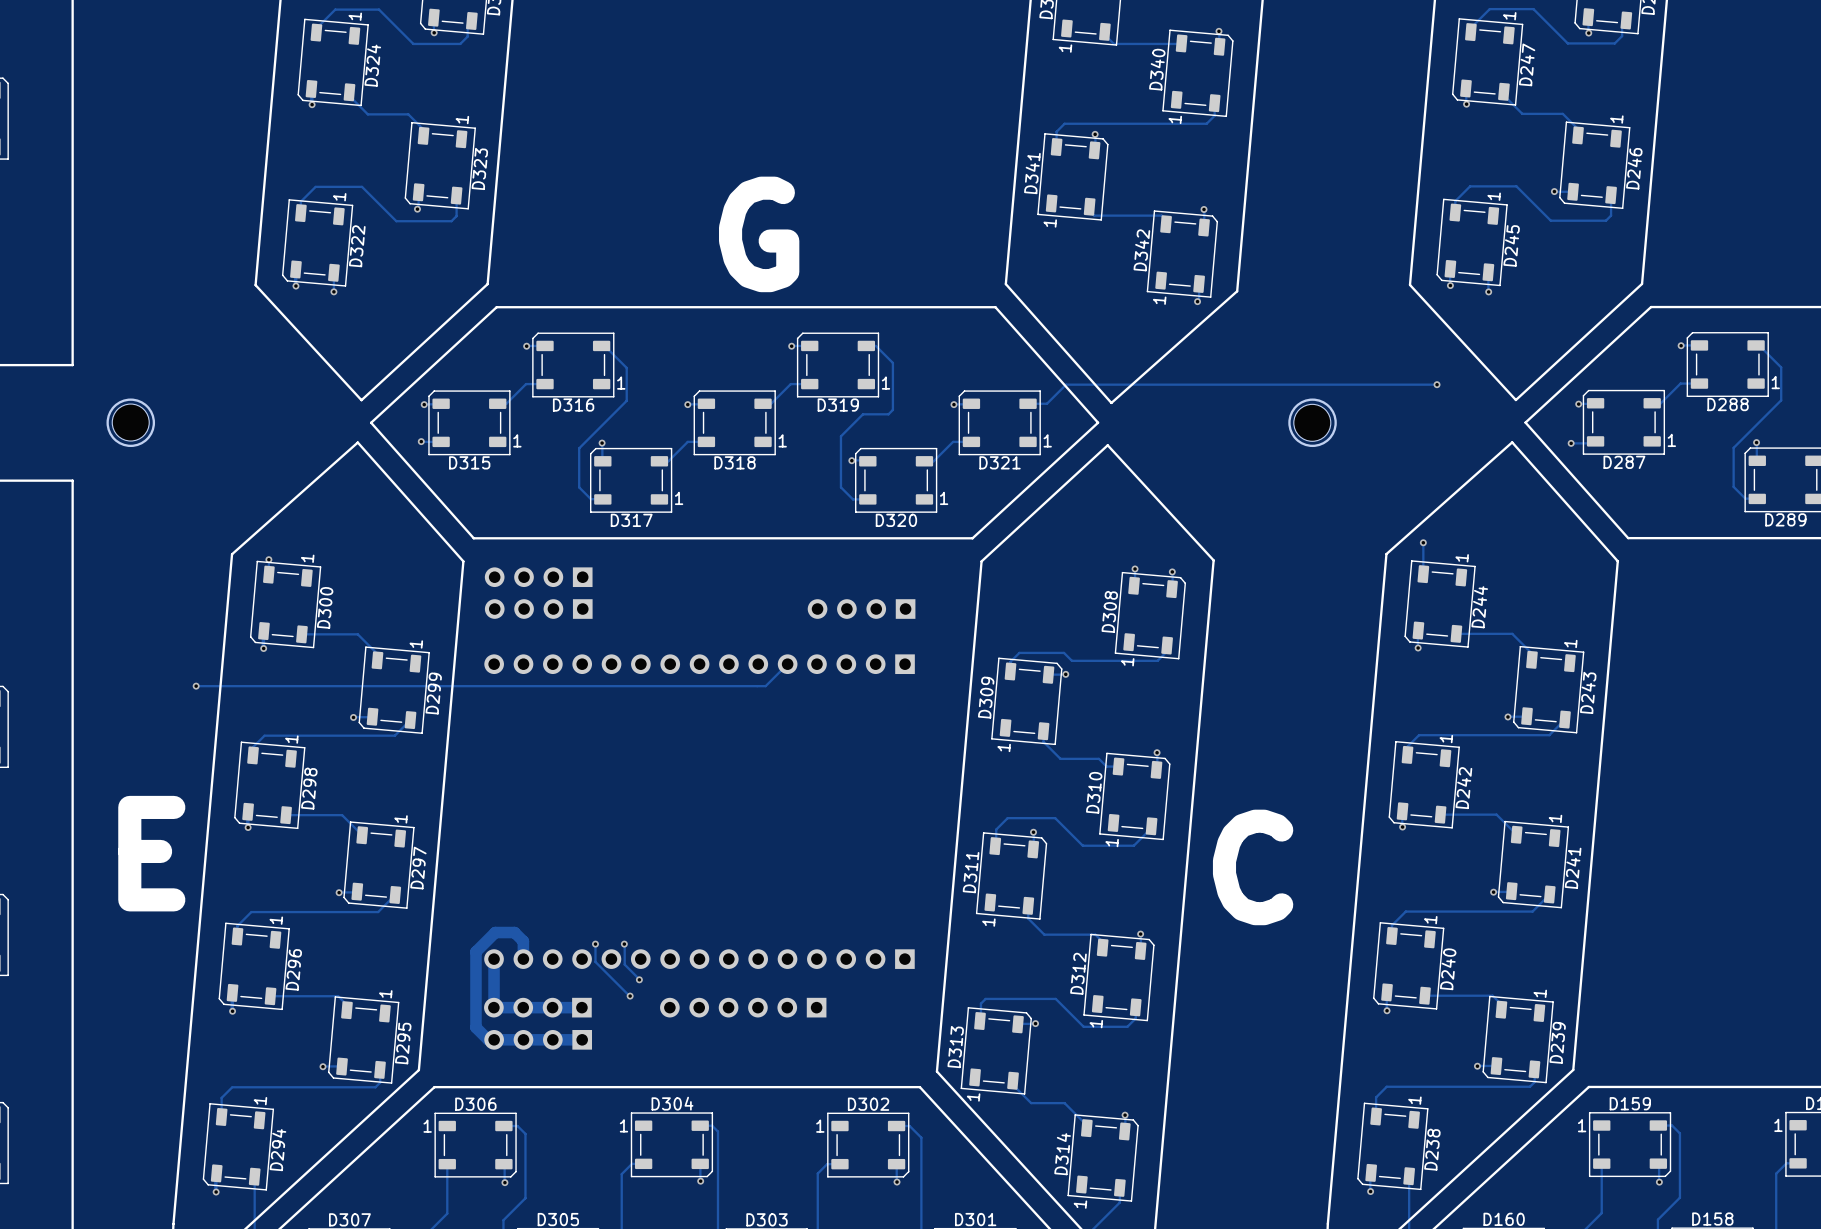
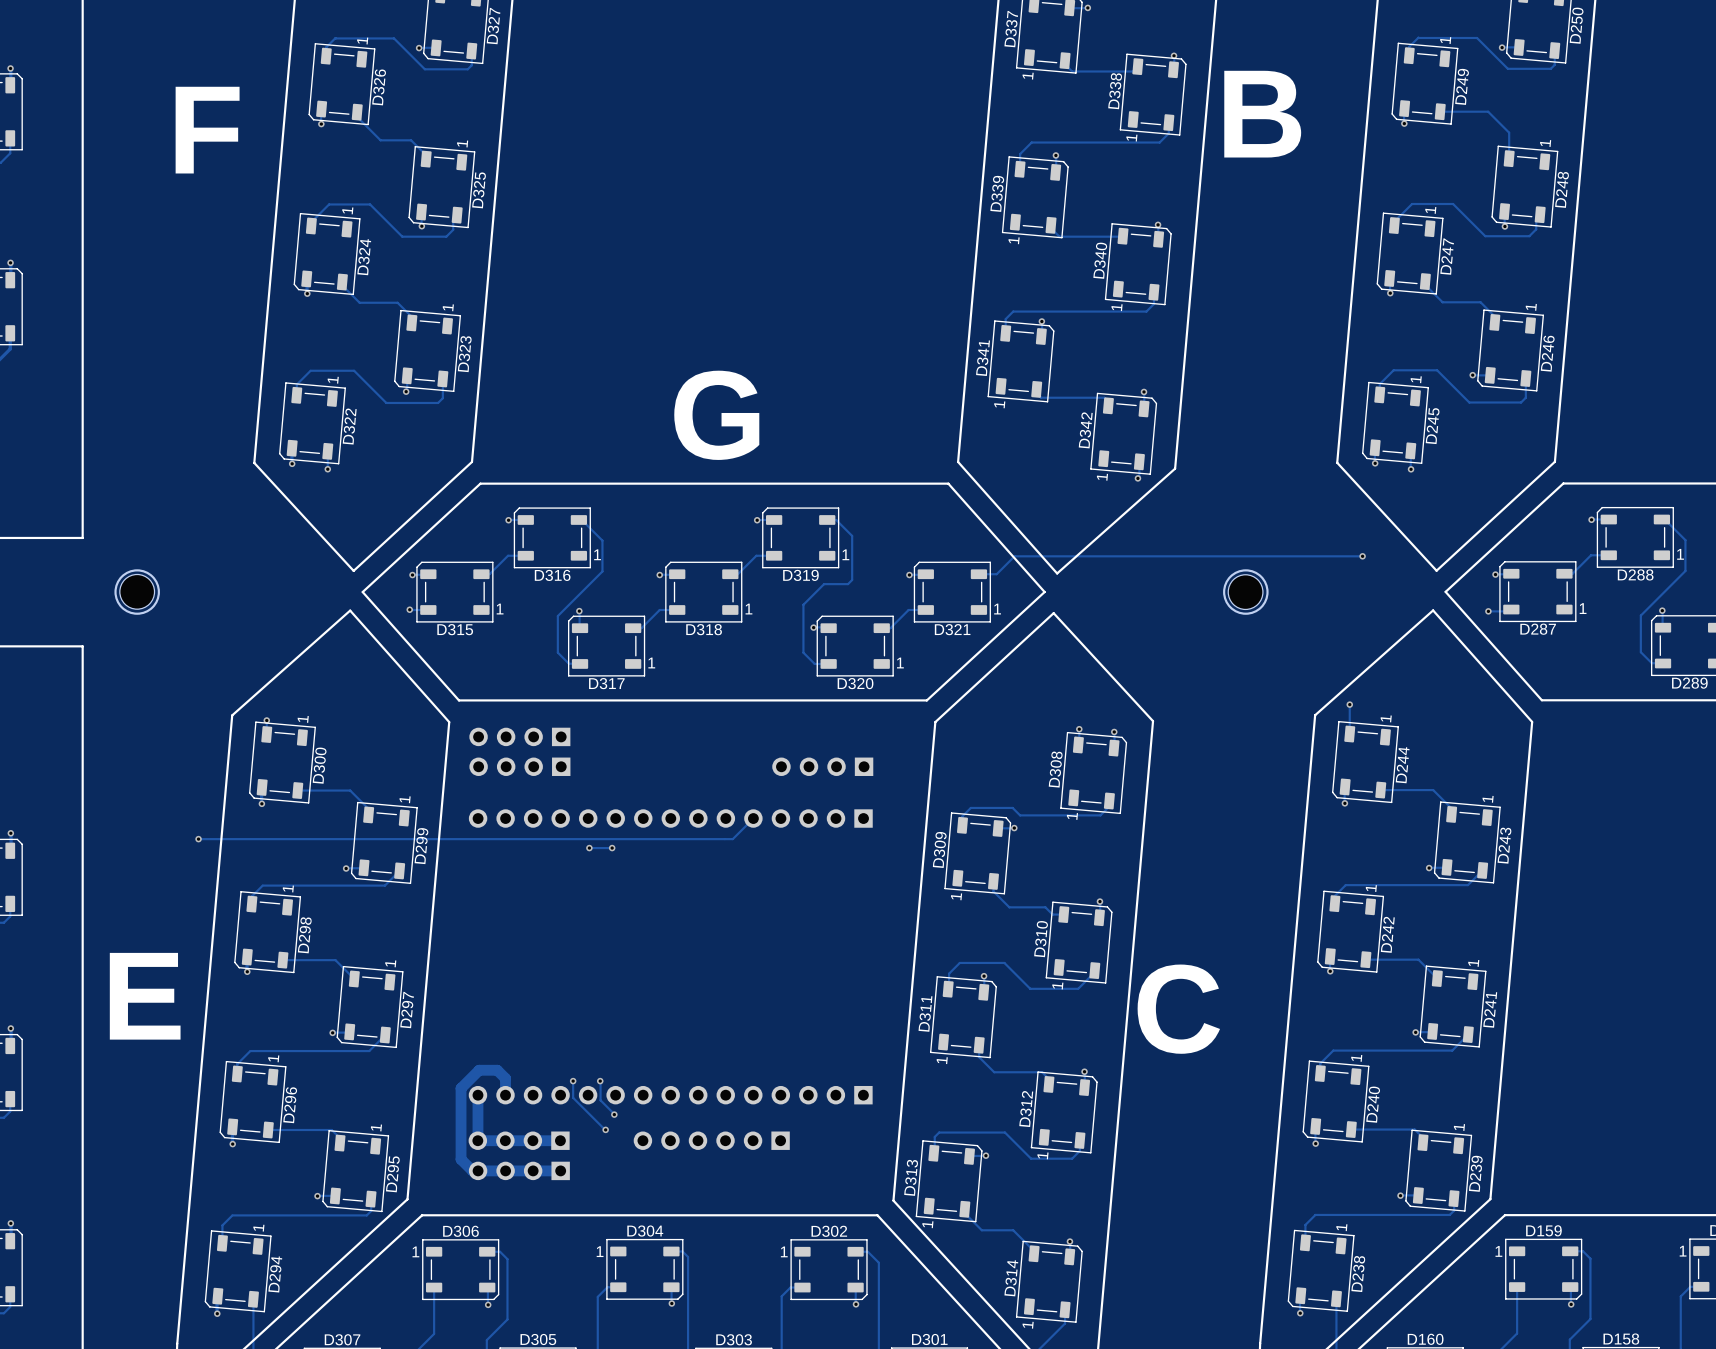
track: none -> (589, 848) (612, 848)
via: none -> (589, 848)
via: none -> (612, 848)

